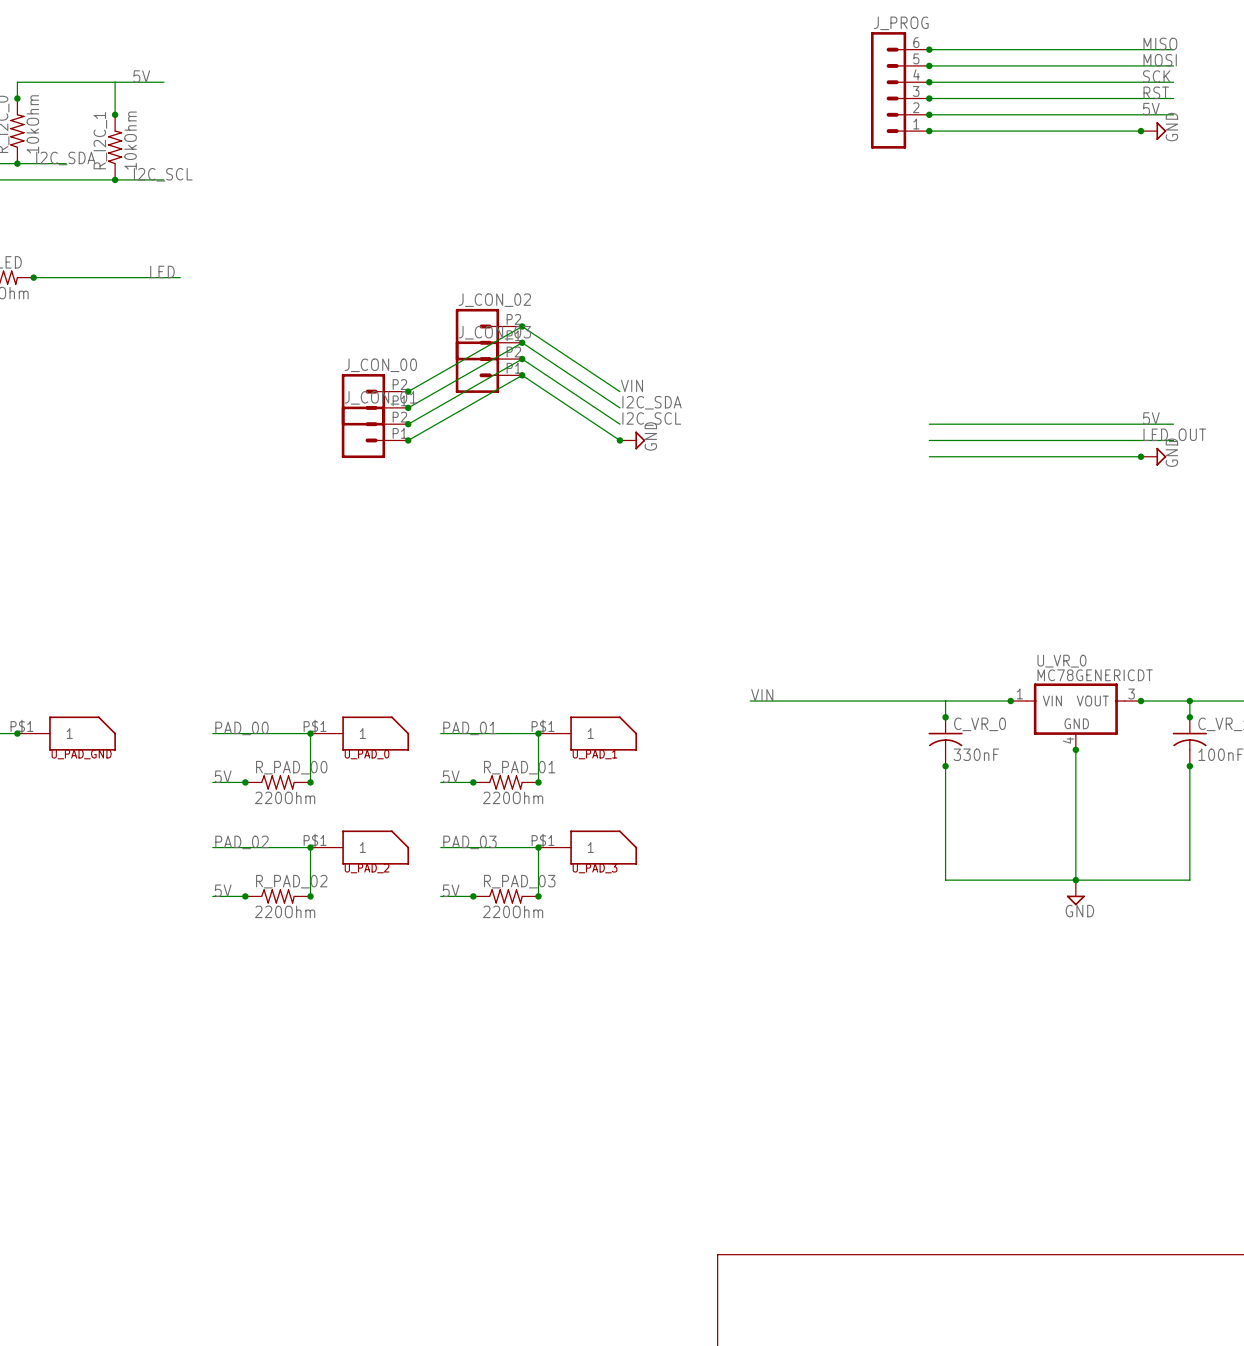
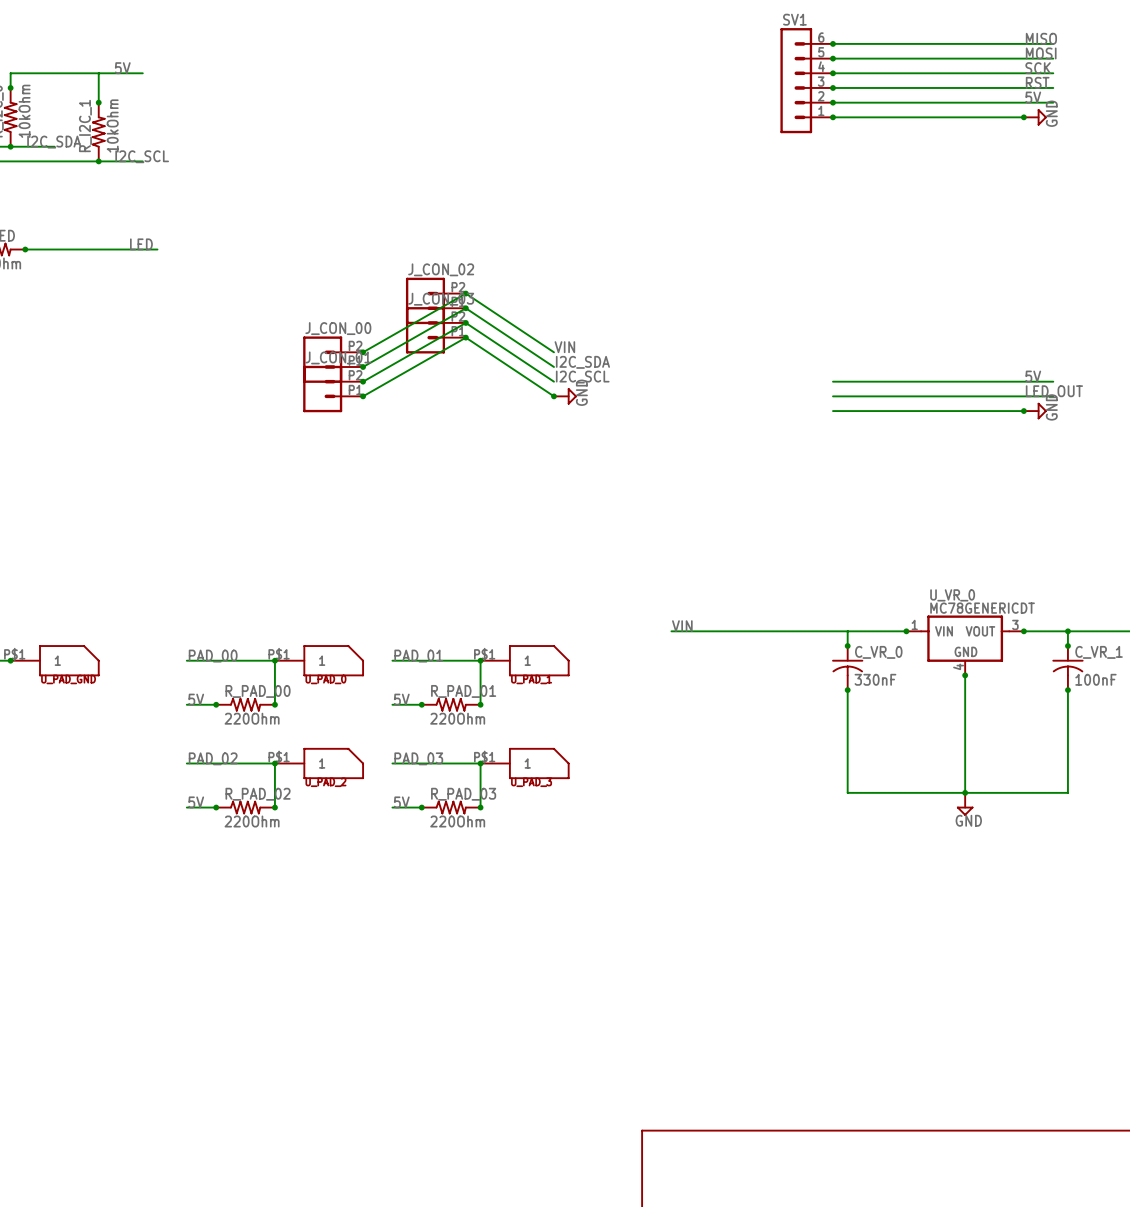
J_PROG name: J_PROG (901, 23) -> SV1 (794, 19)

